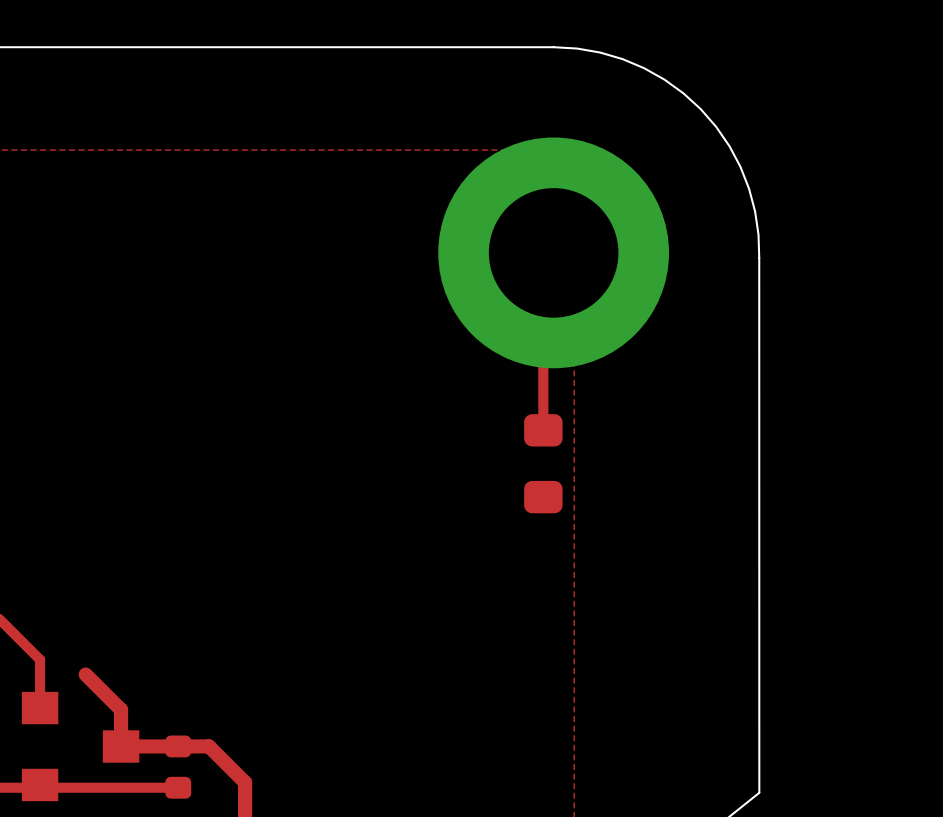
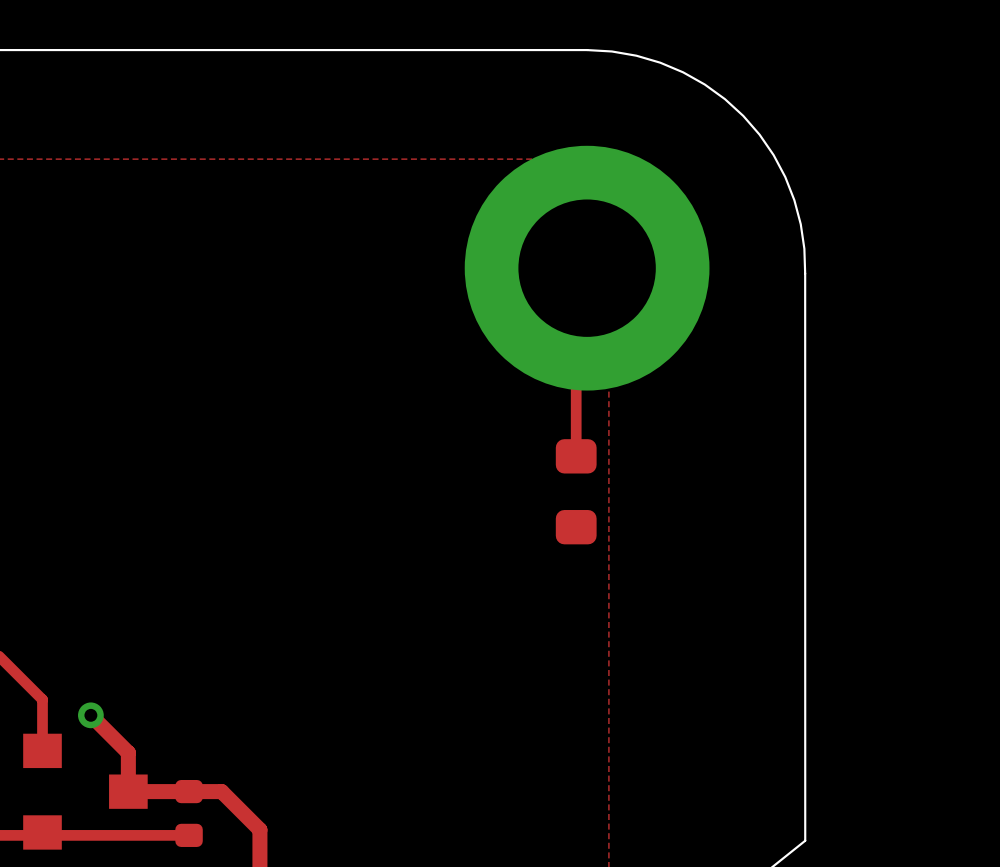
via: none -> (90, 715)

